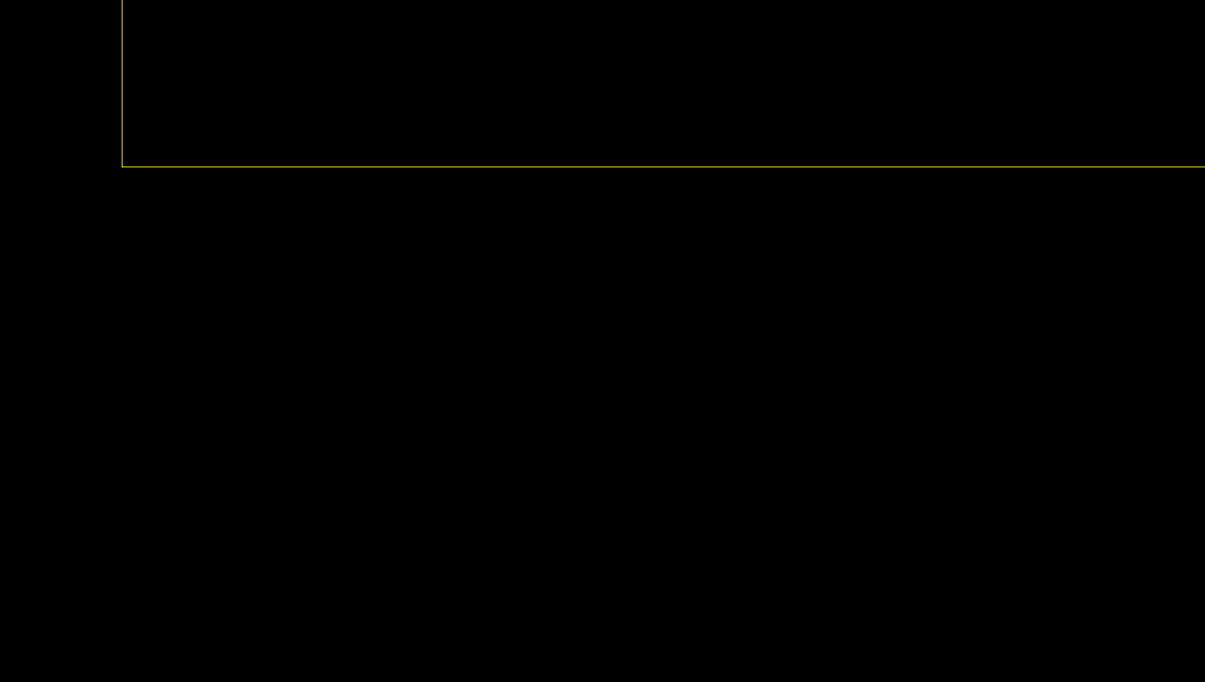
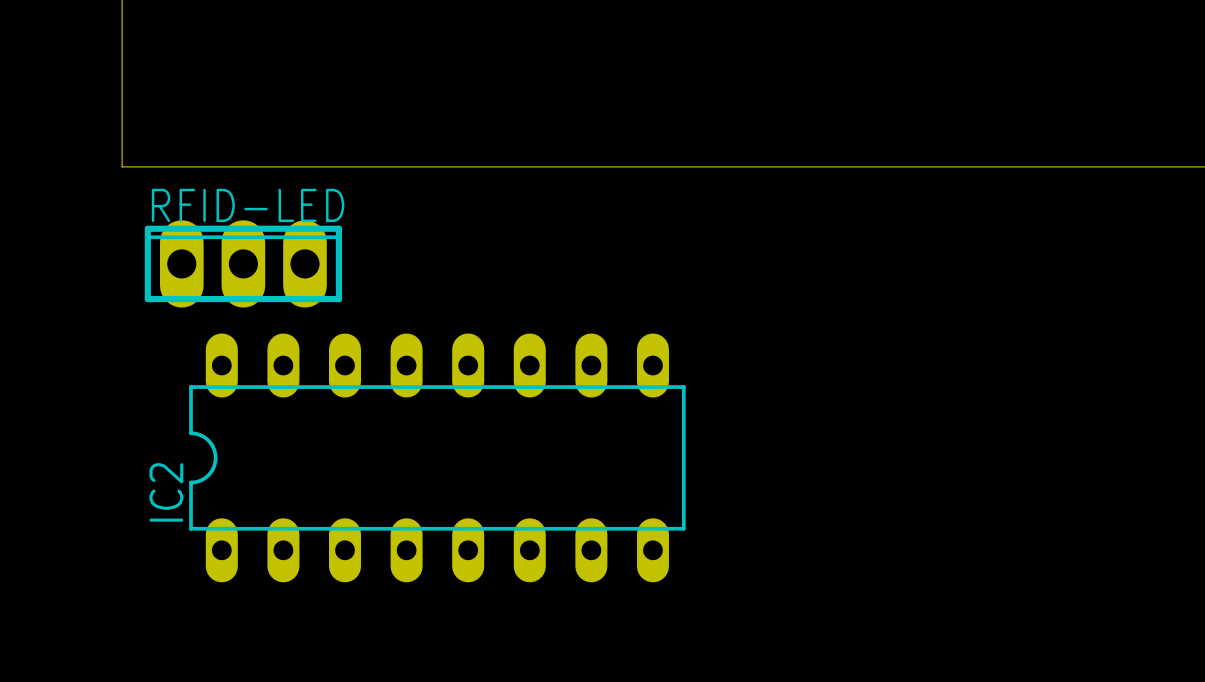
RFID-LED: none -> (243, 263)
IC2: none -> (437, 457)

